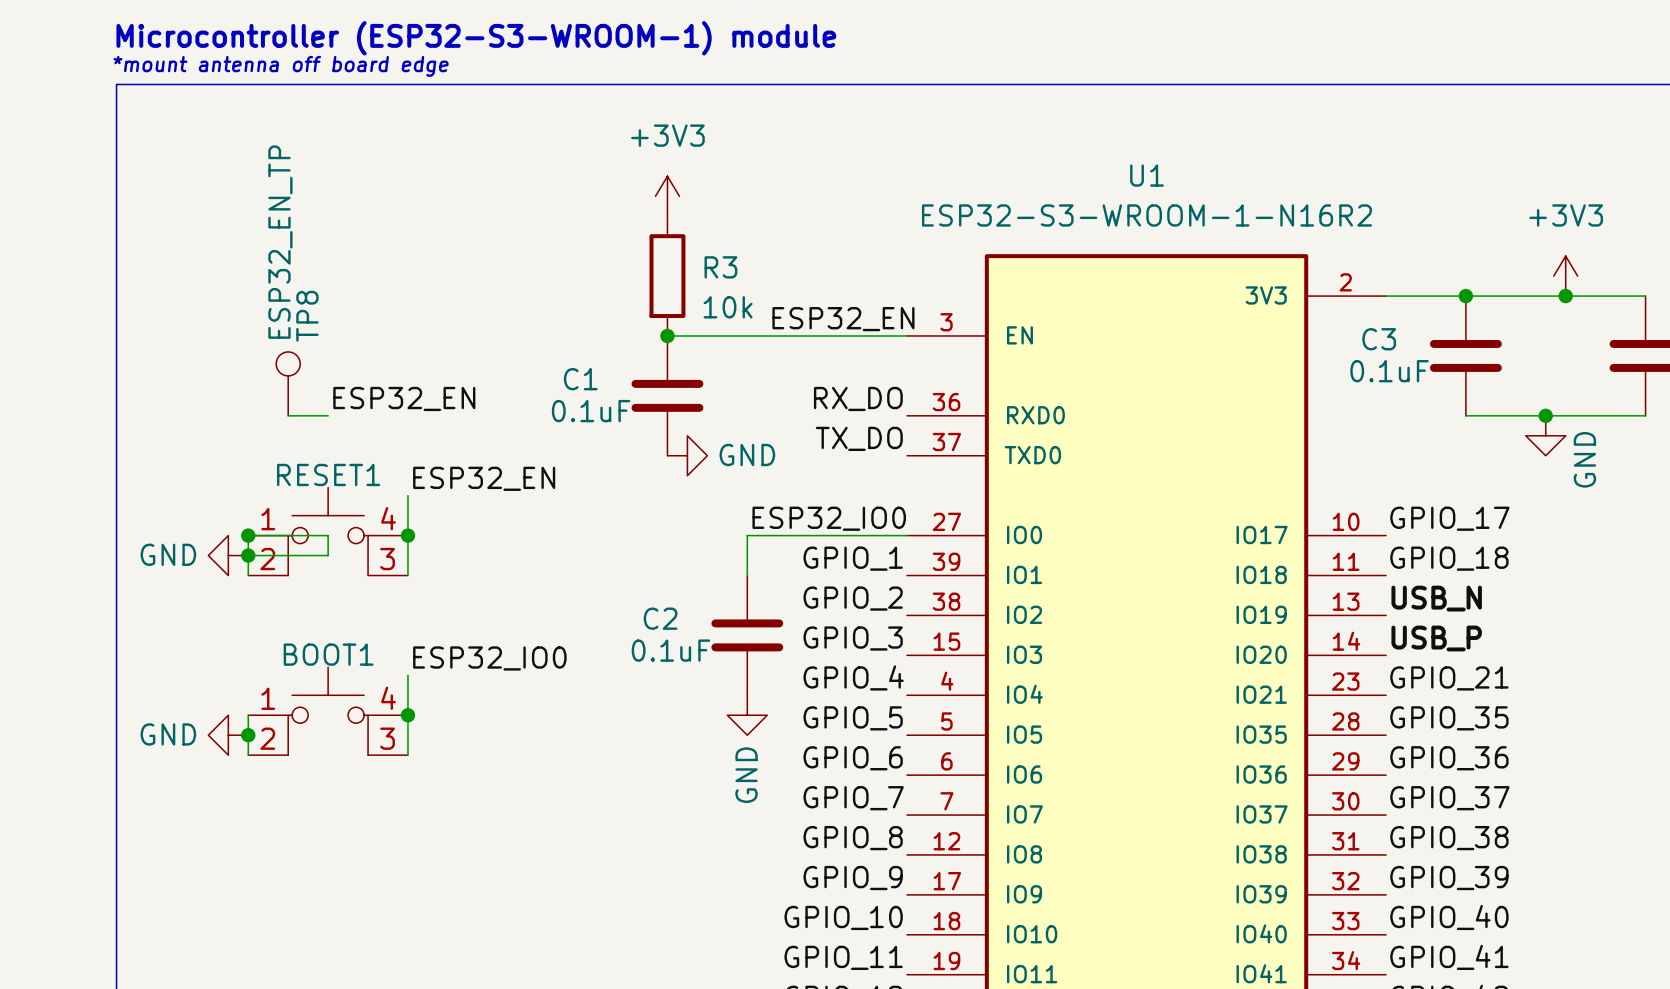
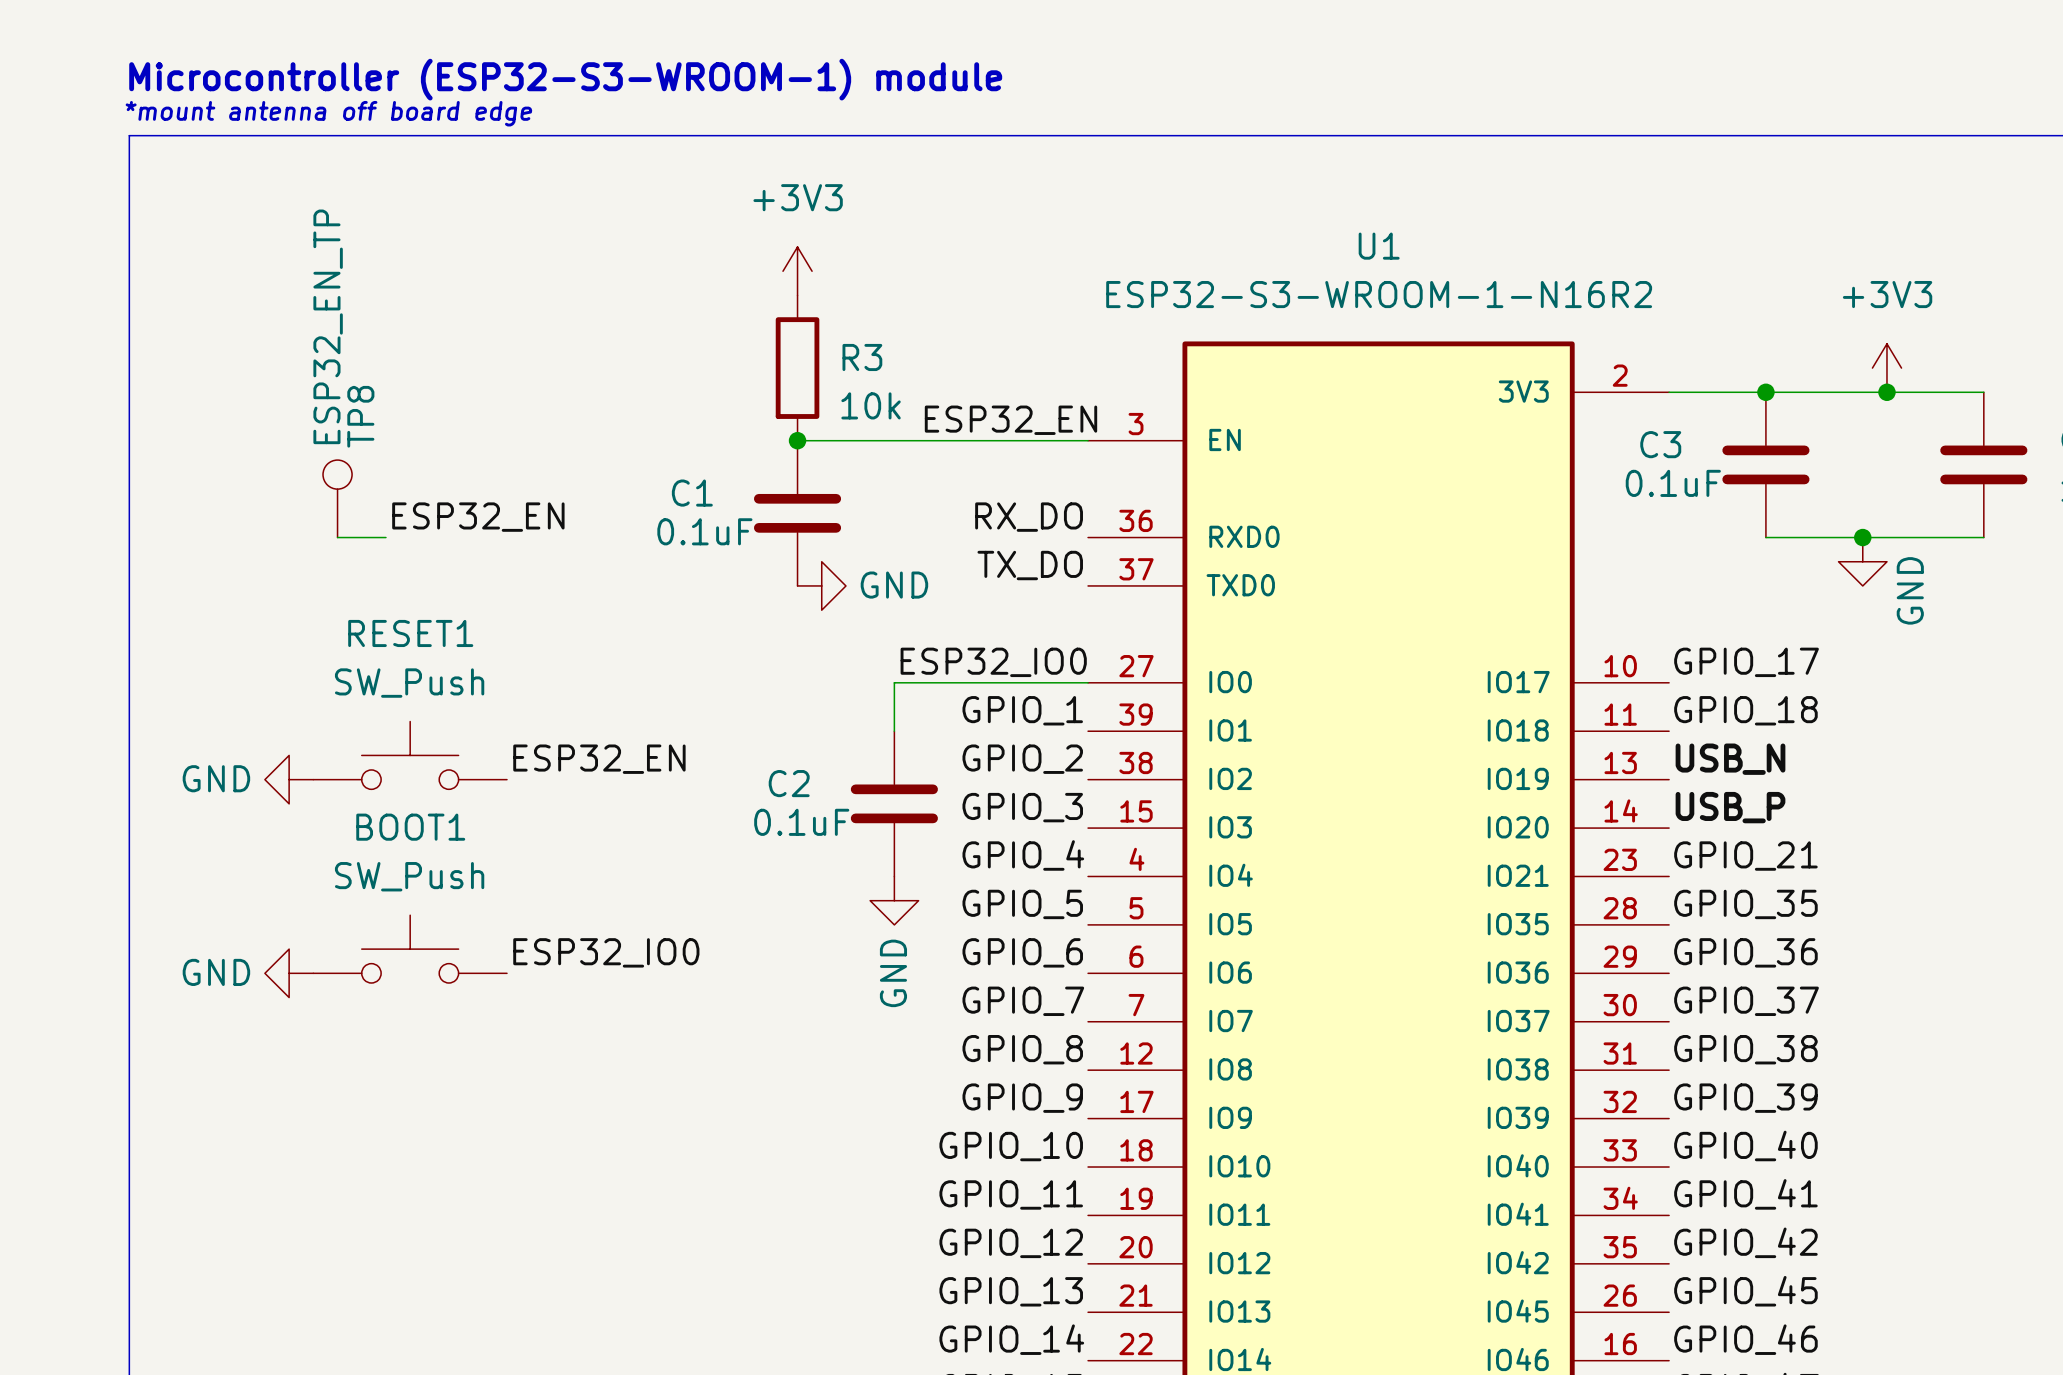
RESET1 name position: RESET1 (328, 474) -> RESET1 (410, 633)
label position: ESP32_EN (484, 478) -> ESP32_EN (599, 759)
RESET1 symbol: [248, 487, 408, 576] -> [313, 721, 508, 790]
wire: (407, 495) (407, 575) -> none
junction: (248, 535) -> none
RESET1 value: none -> SW_Push (409, 683)
junction: (407, 535) -> none
power symbol: GND (228, 555) -> none
wire: (248, 555) (328, 555) (328, 535) (248, 535) (248, 575) -> none
junction: (248, 555) -> none
power symbol: none -> GND (289, 779)
BOOT1 name position: BOOT1 (328, 654) -> BOOT1 (410, 827)
label position: ESP32_IO0 (489, 658) -> ESP32_IO0 (606, 952)
BOOT1 symbol: [248, 667, 408, 756] -> [313, 915, 508, 984]
wire: (407, 675) (407, 755) -> none
BOOT1 value: none -> SW_Push (409, 876)
wire: (248, 715) (248, 755) -> none
junction: (407, 715) -> none
power symbol position: GND (228, 735) -> GND (289, 973)
junction: (248, 735) -> none

